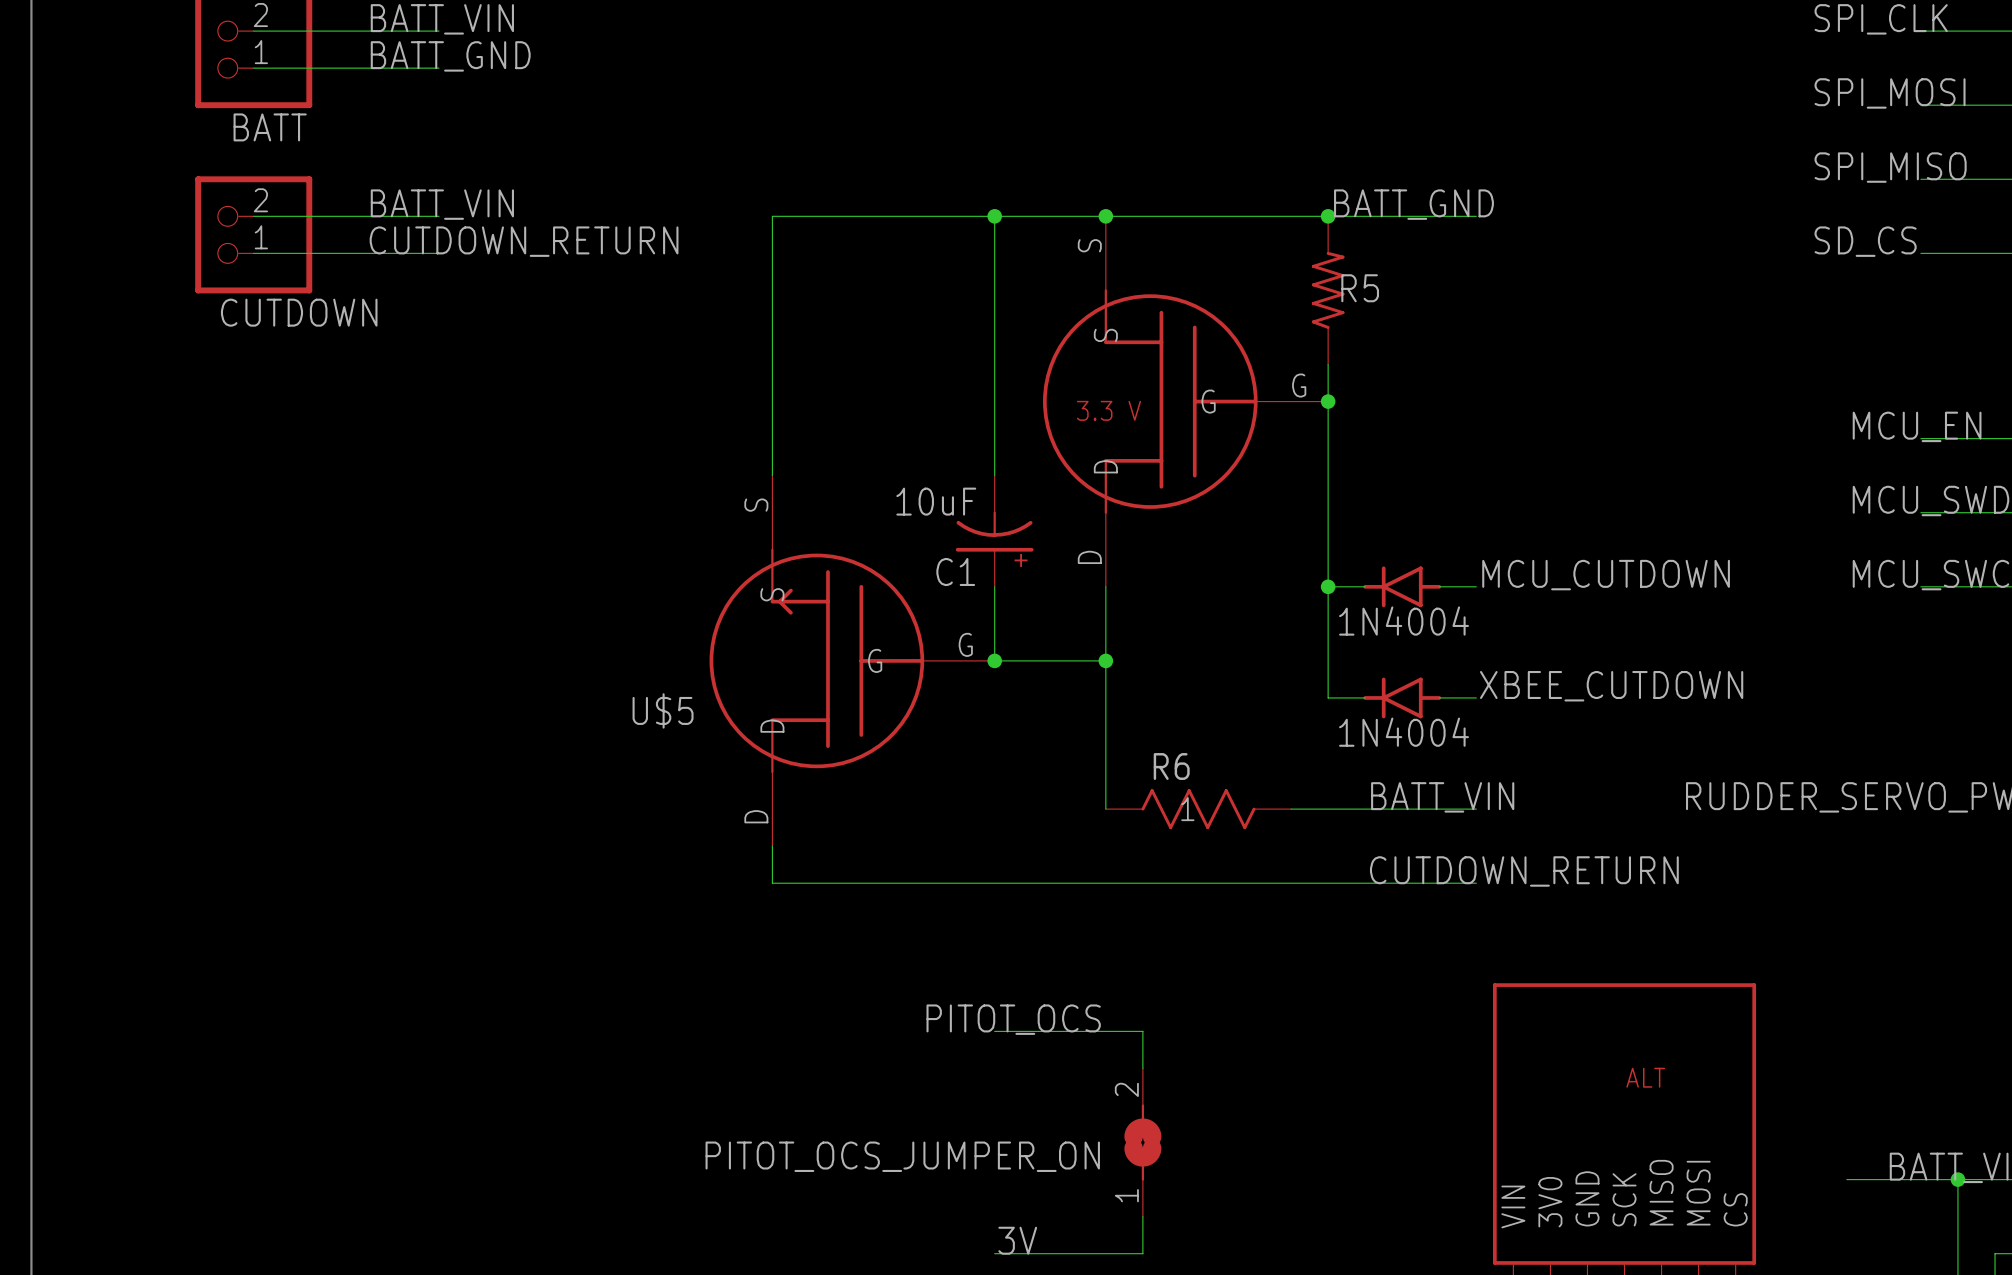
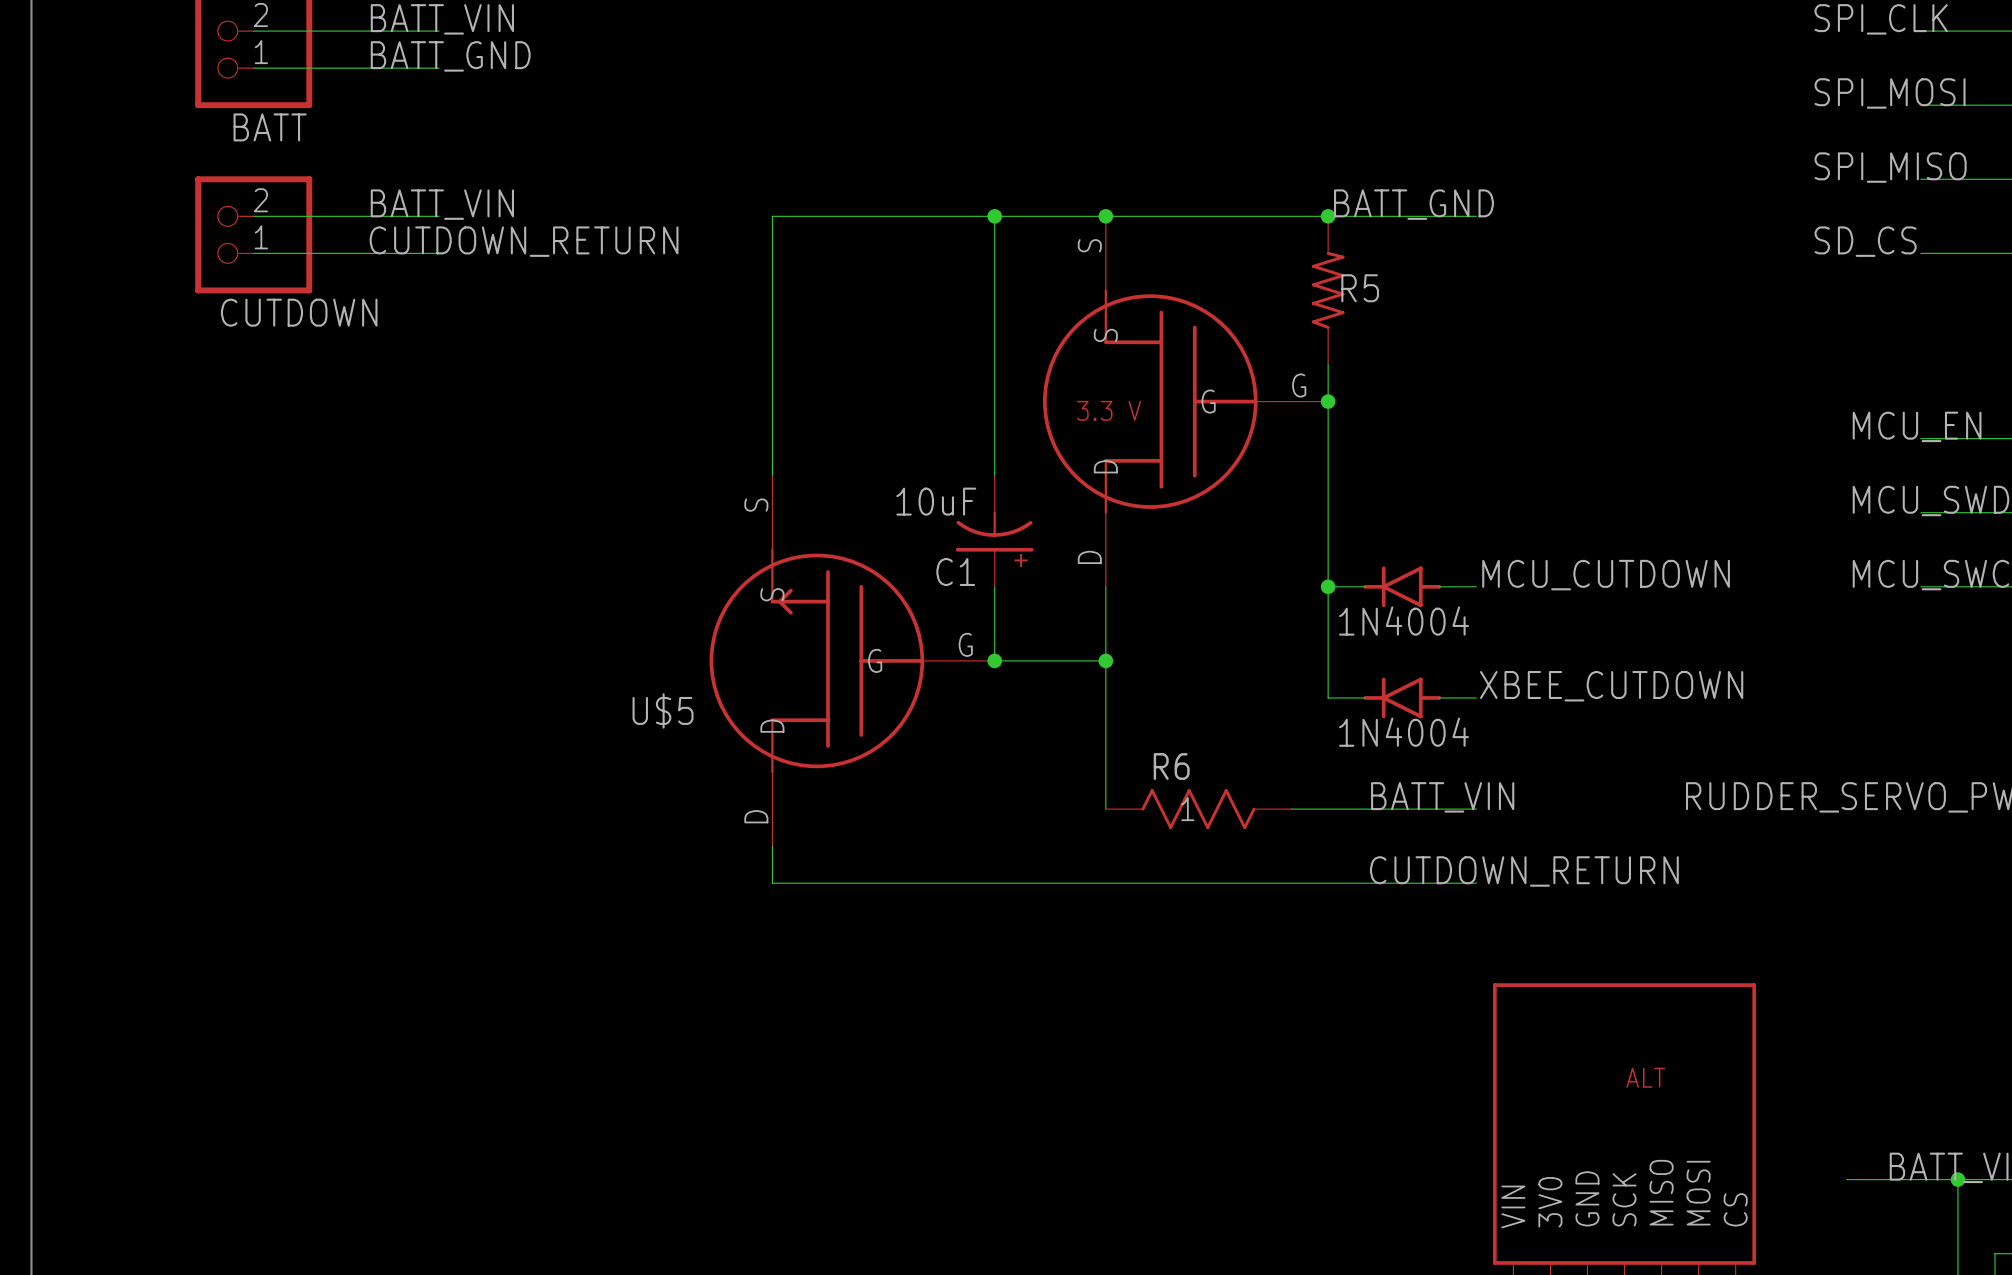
label: PITOT_OCS (1013, 1019) -> none
wire: (994, 1031) (1142, 1031) (1142, 1068) -> none
PITOT_OCS_JUMPER_ON: (1142, 1142) -> none
wire: (1142, 1216) (1142, 1253) (994, 1253) -> none
label: 3V (1017, 1240) -> none

